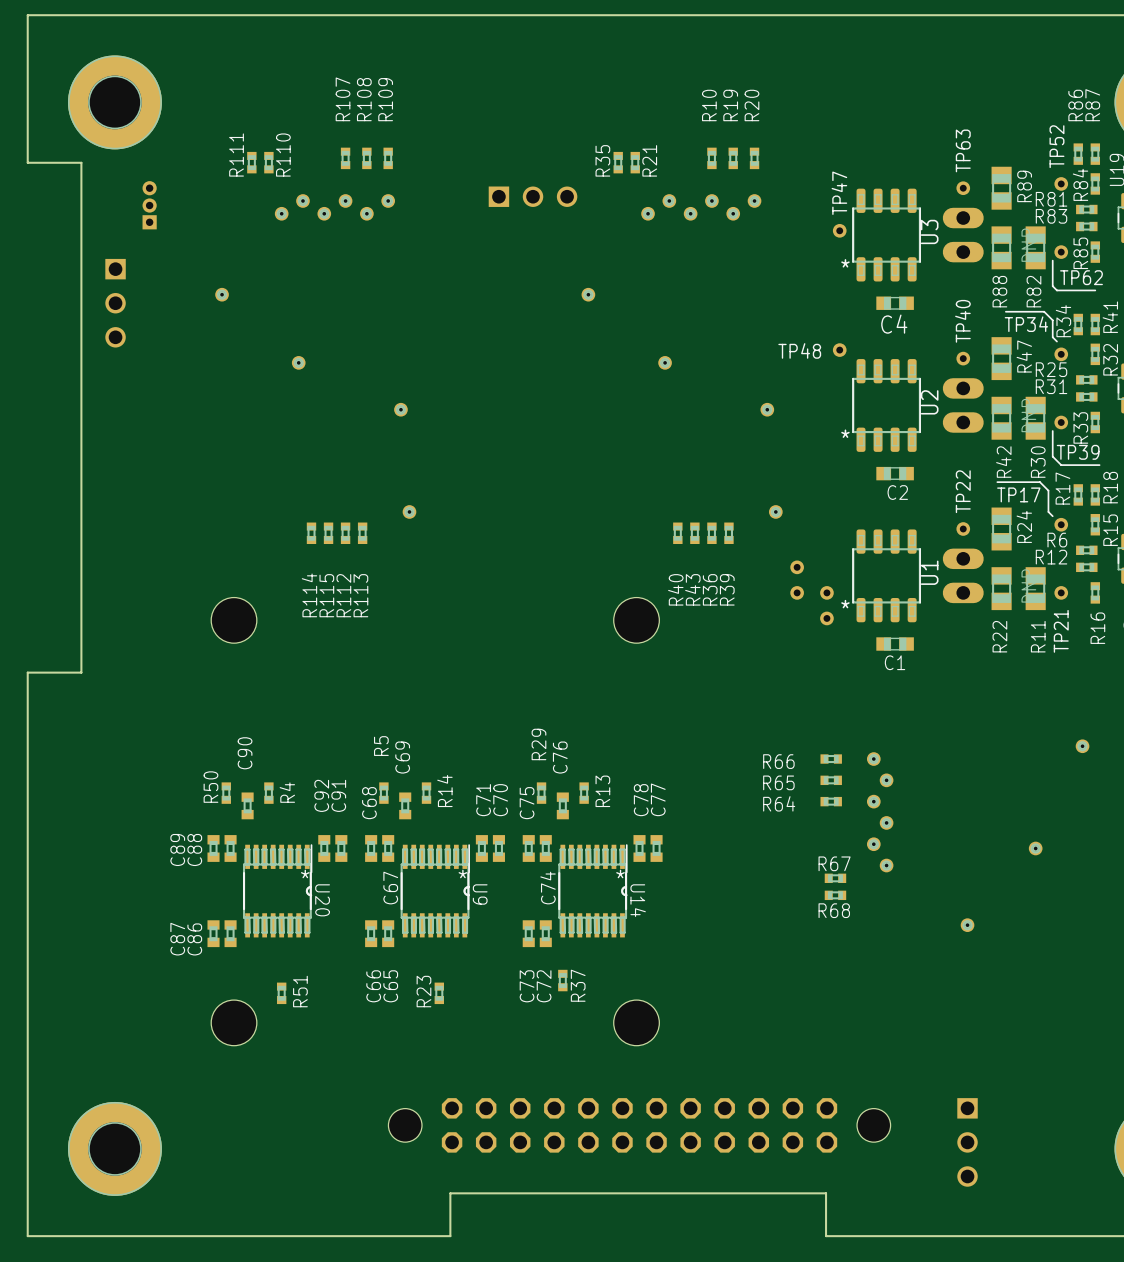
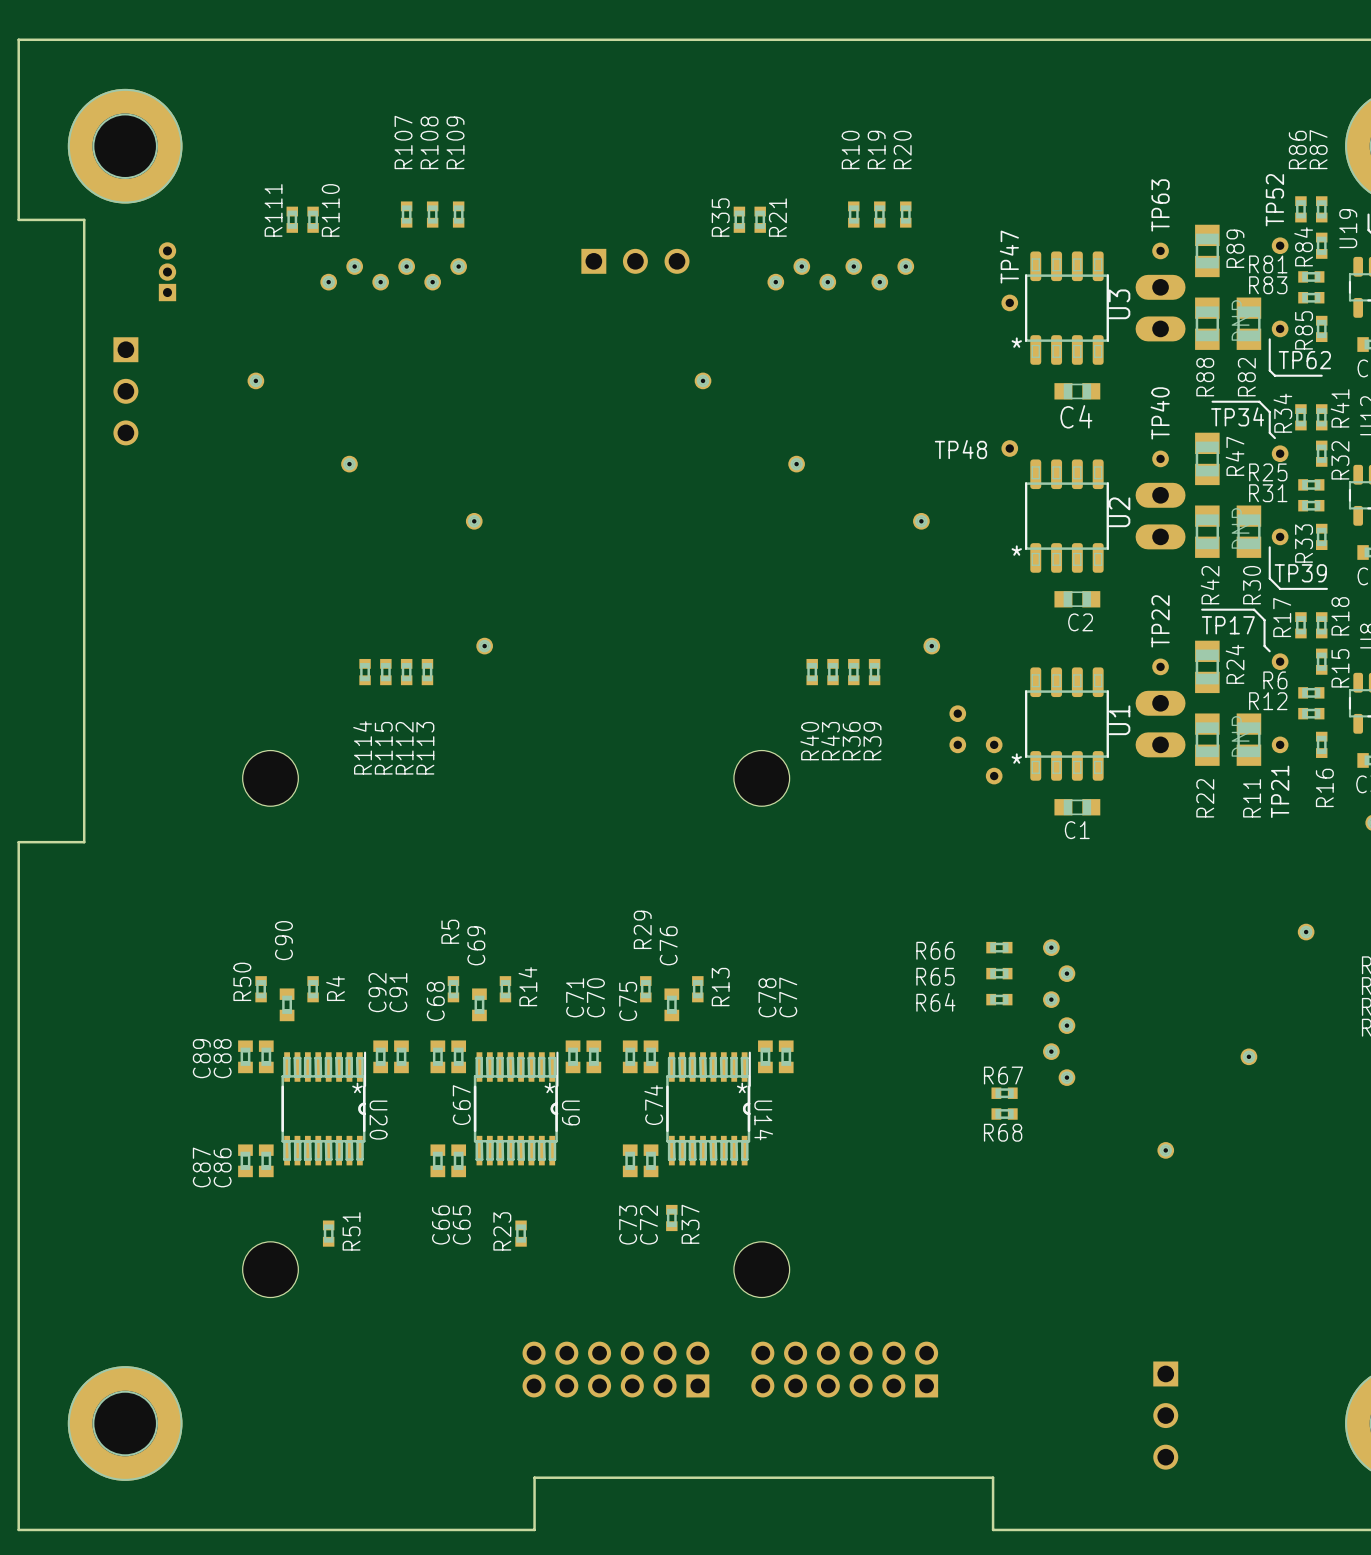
part: none -> (615, 1369)
part: none -> (844, 1369)
hole: (405, 1125) -> none
part: (639, 1125) -> none
hole: (873, 1125) -> none

